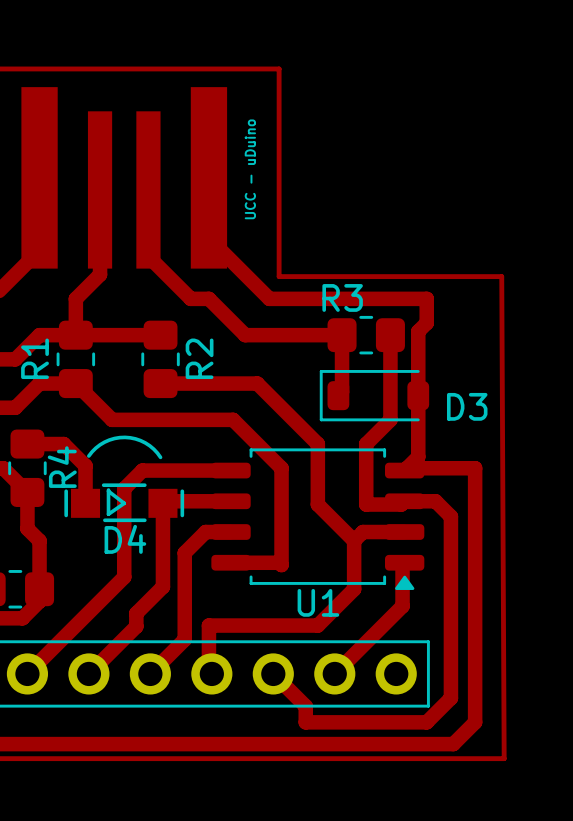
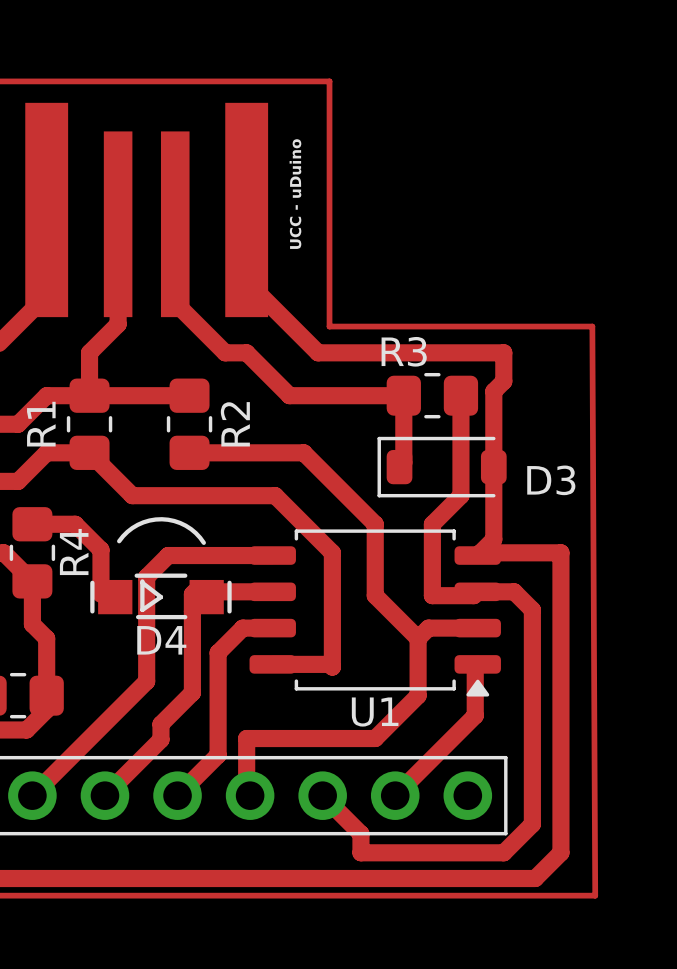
D4 position: (124, 478) -> (160, 568)

